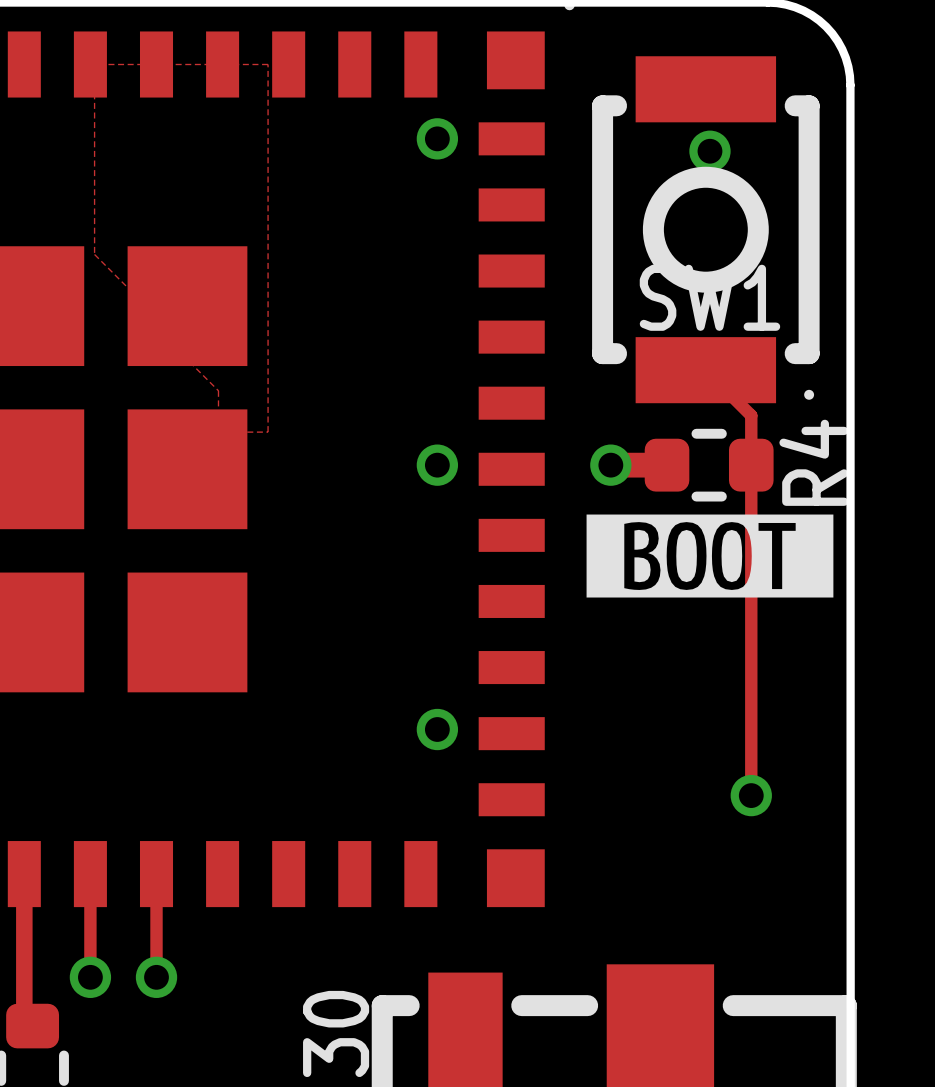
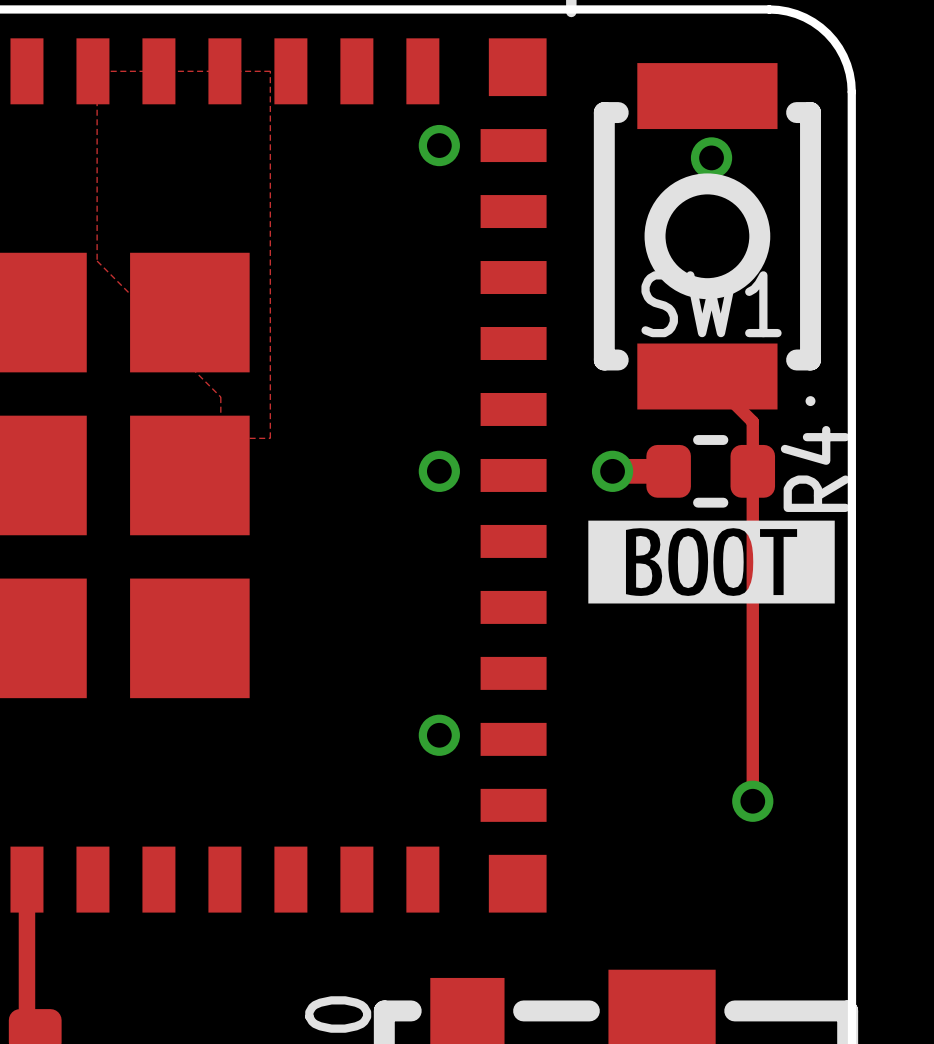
track: (90, 874) (90, 977) -> none
track: (156, 874) (156, 977) -> none
via: (90, 977) -> none
via: (156, 977) -> none

